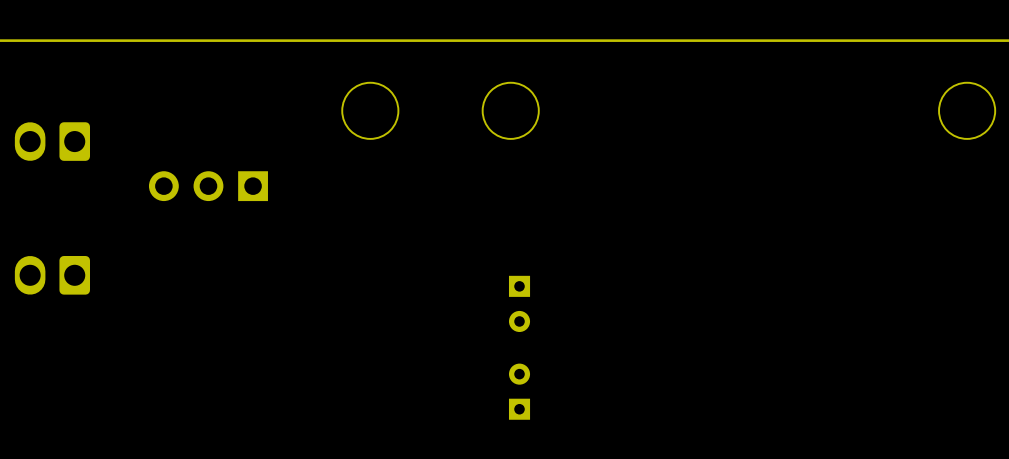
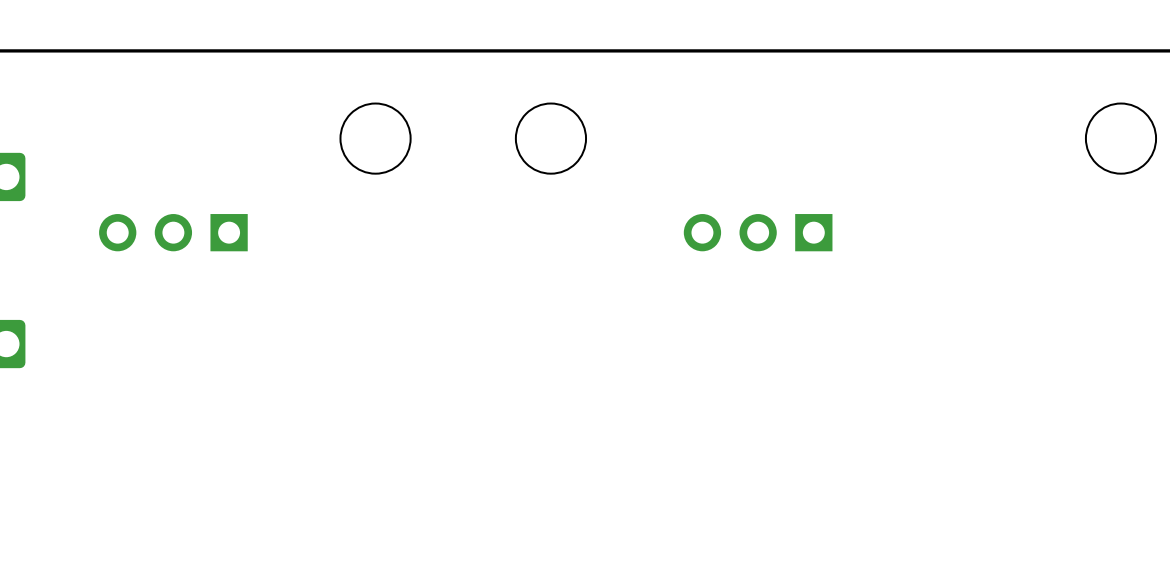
part: none -> (758, 232)
part: (519, 303) -> none
part: (519, 391) -> none

